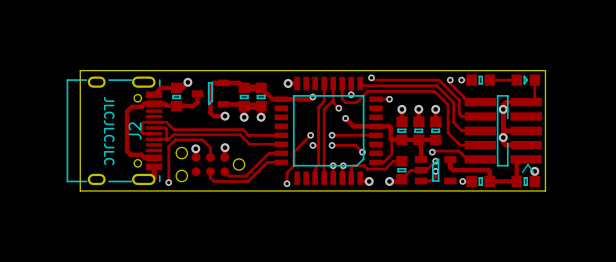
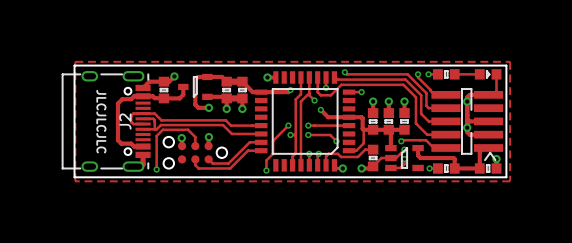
zone outline: none -> (75, 61) (510, 61) (510, 181) (75, 181) (75, 61)

